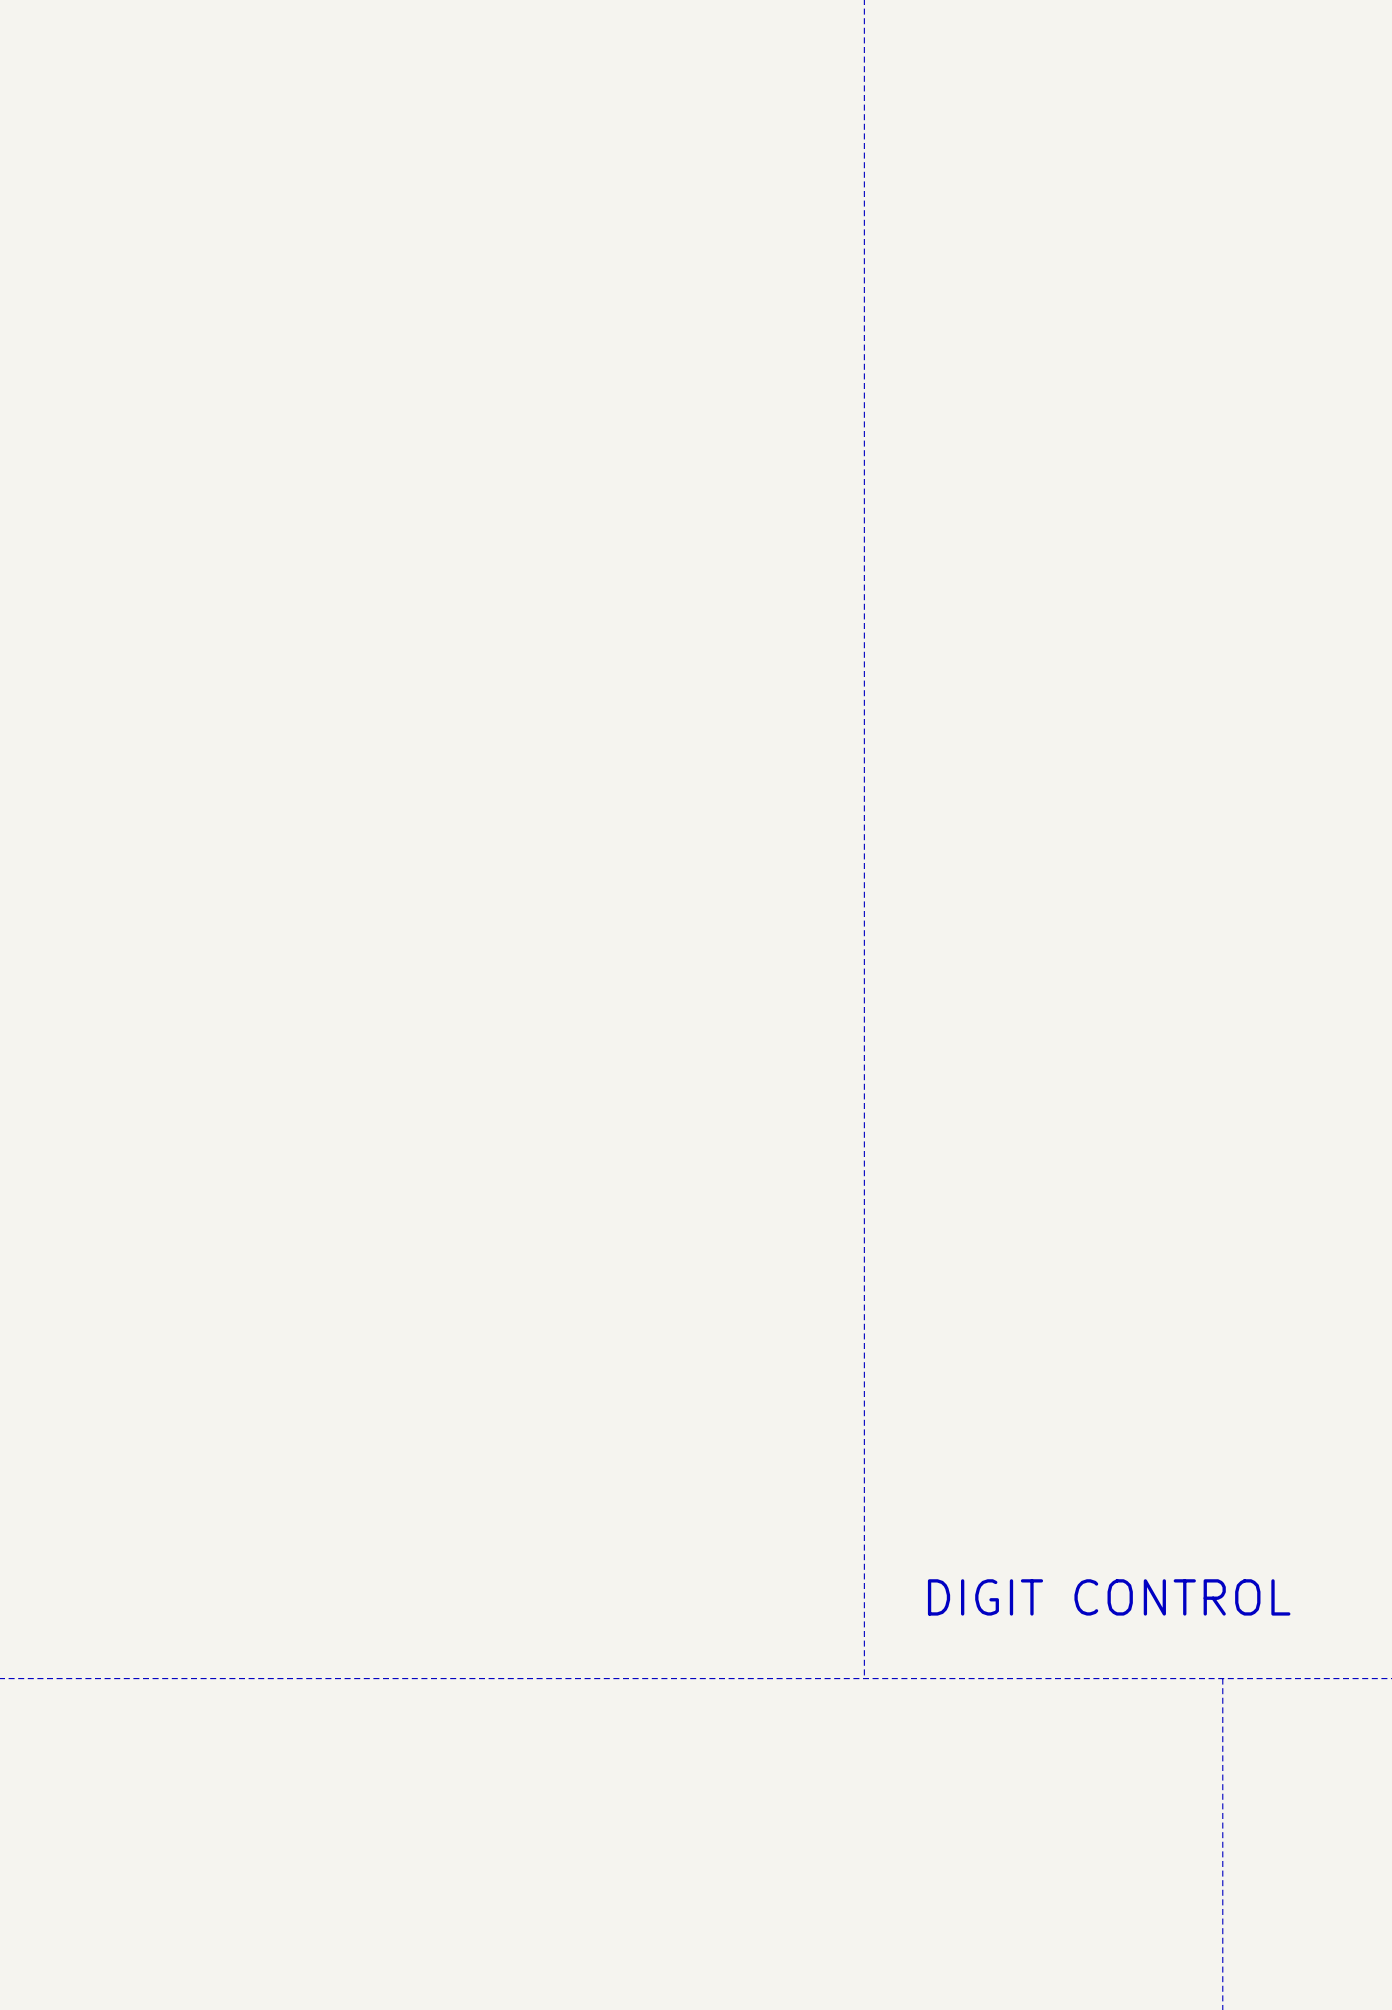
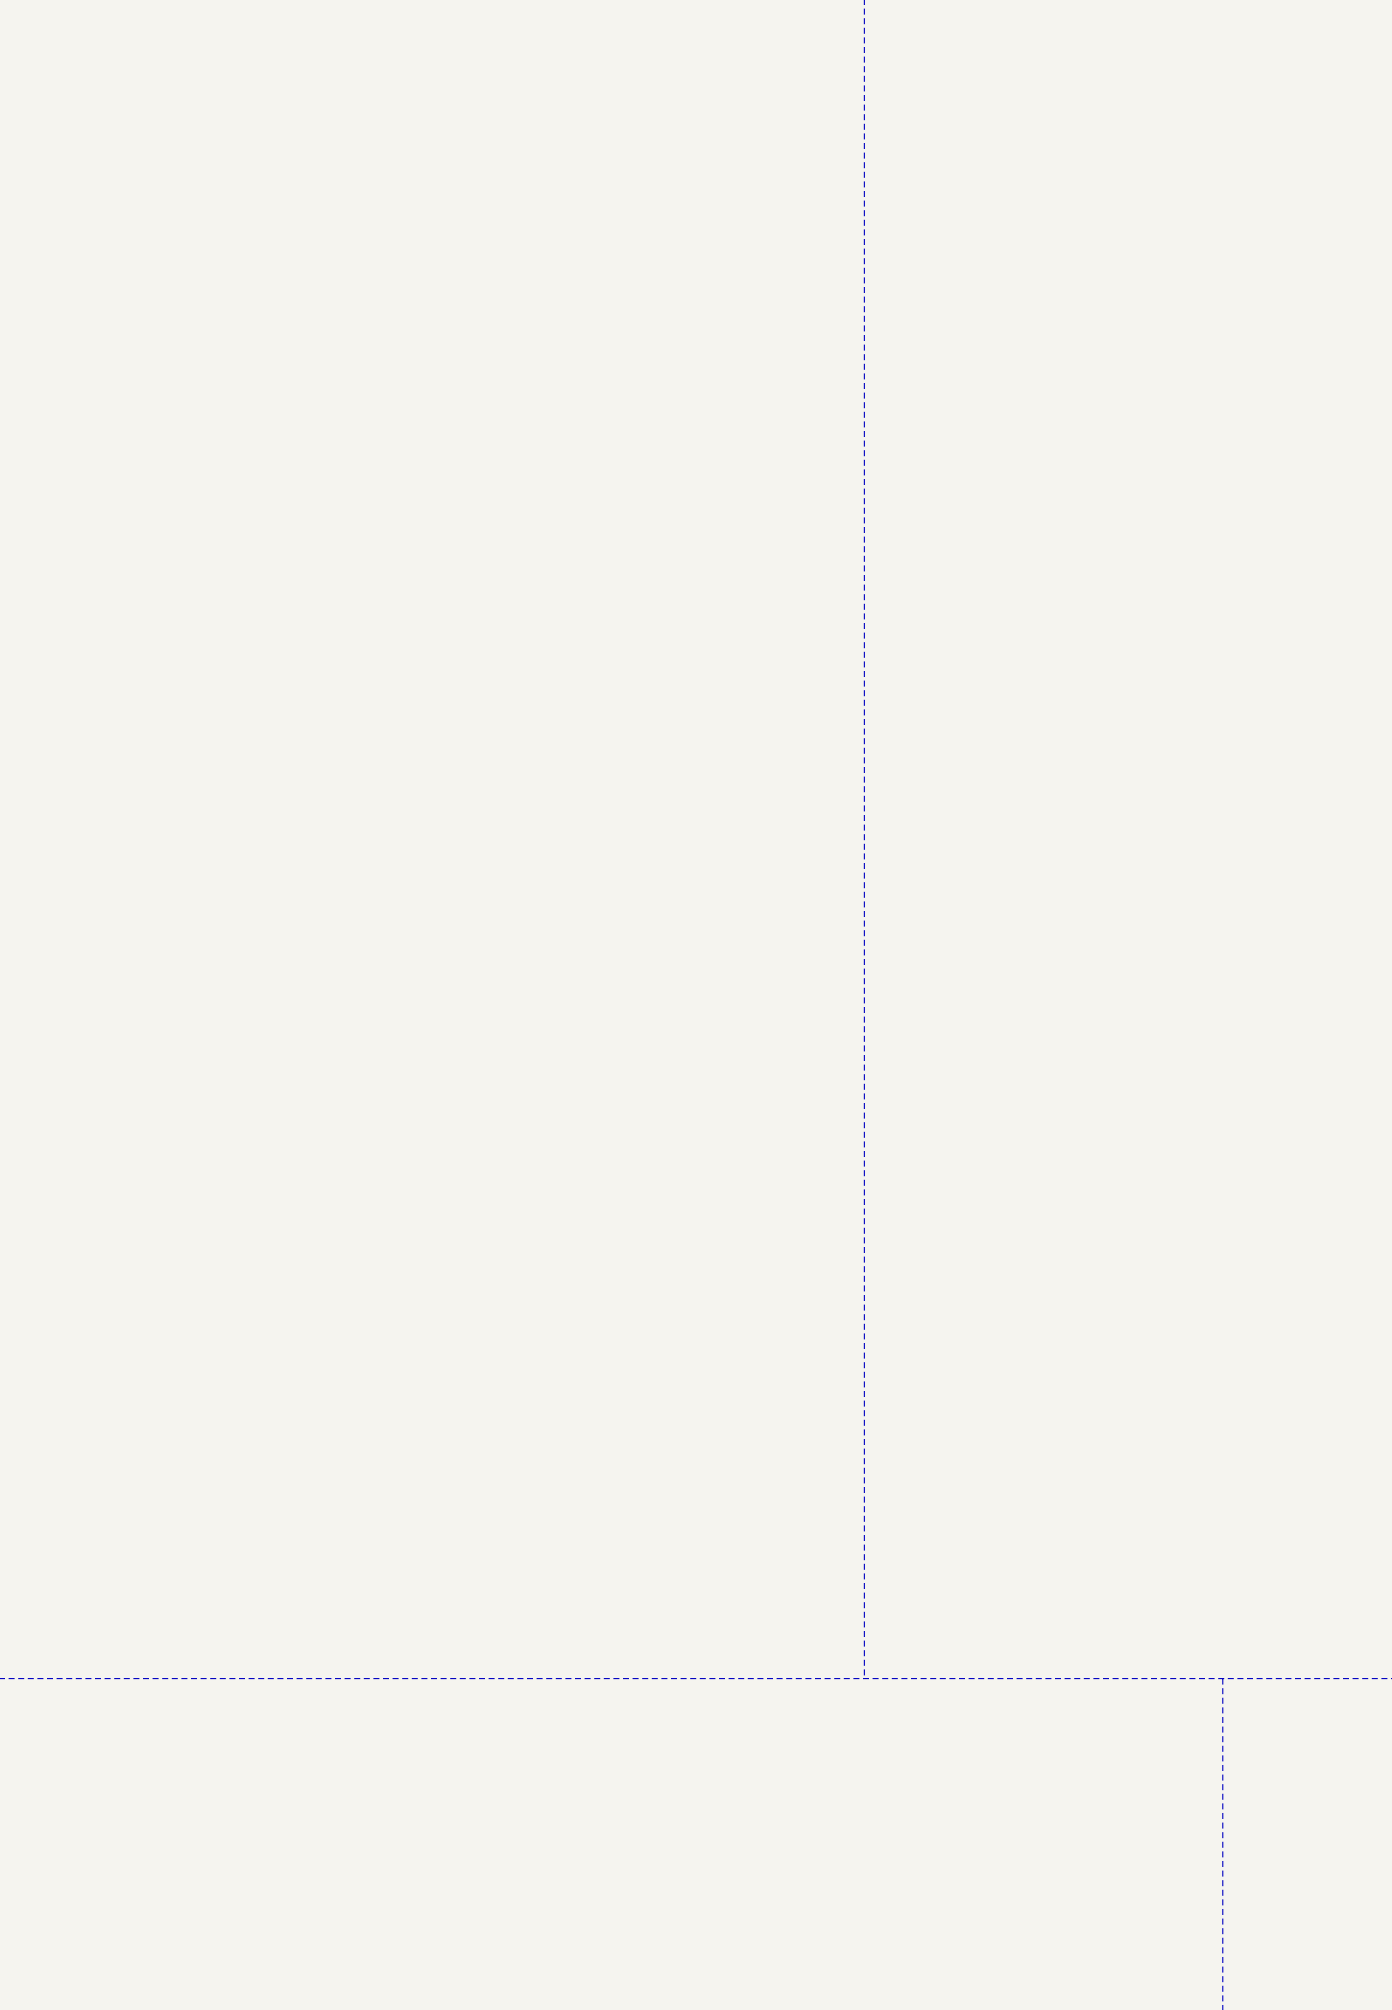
text: DIGIT CONTROL (1109, 1597) -> none

